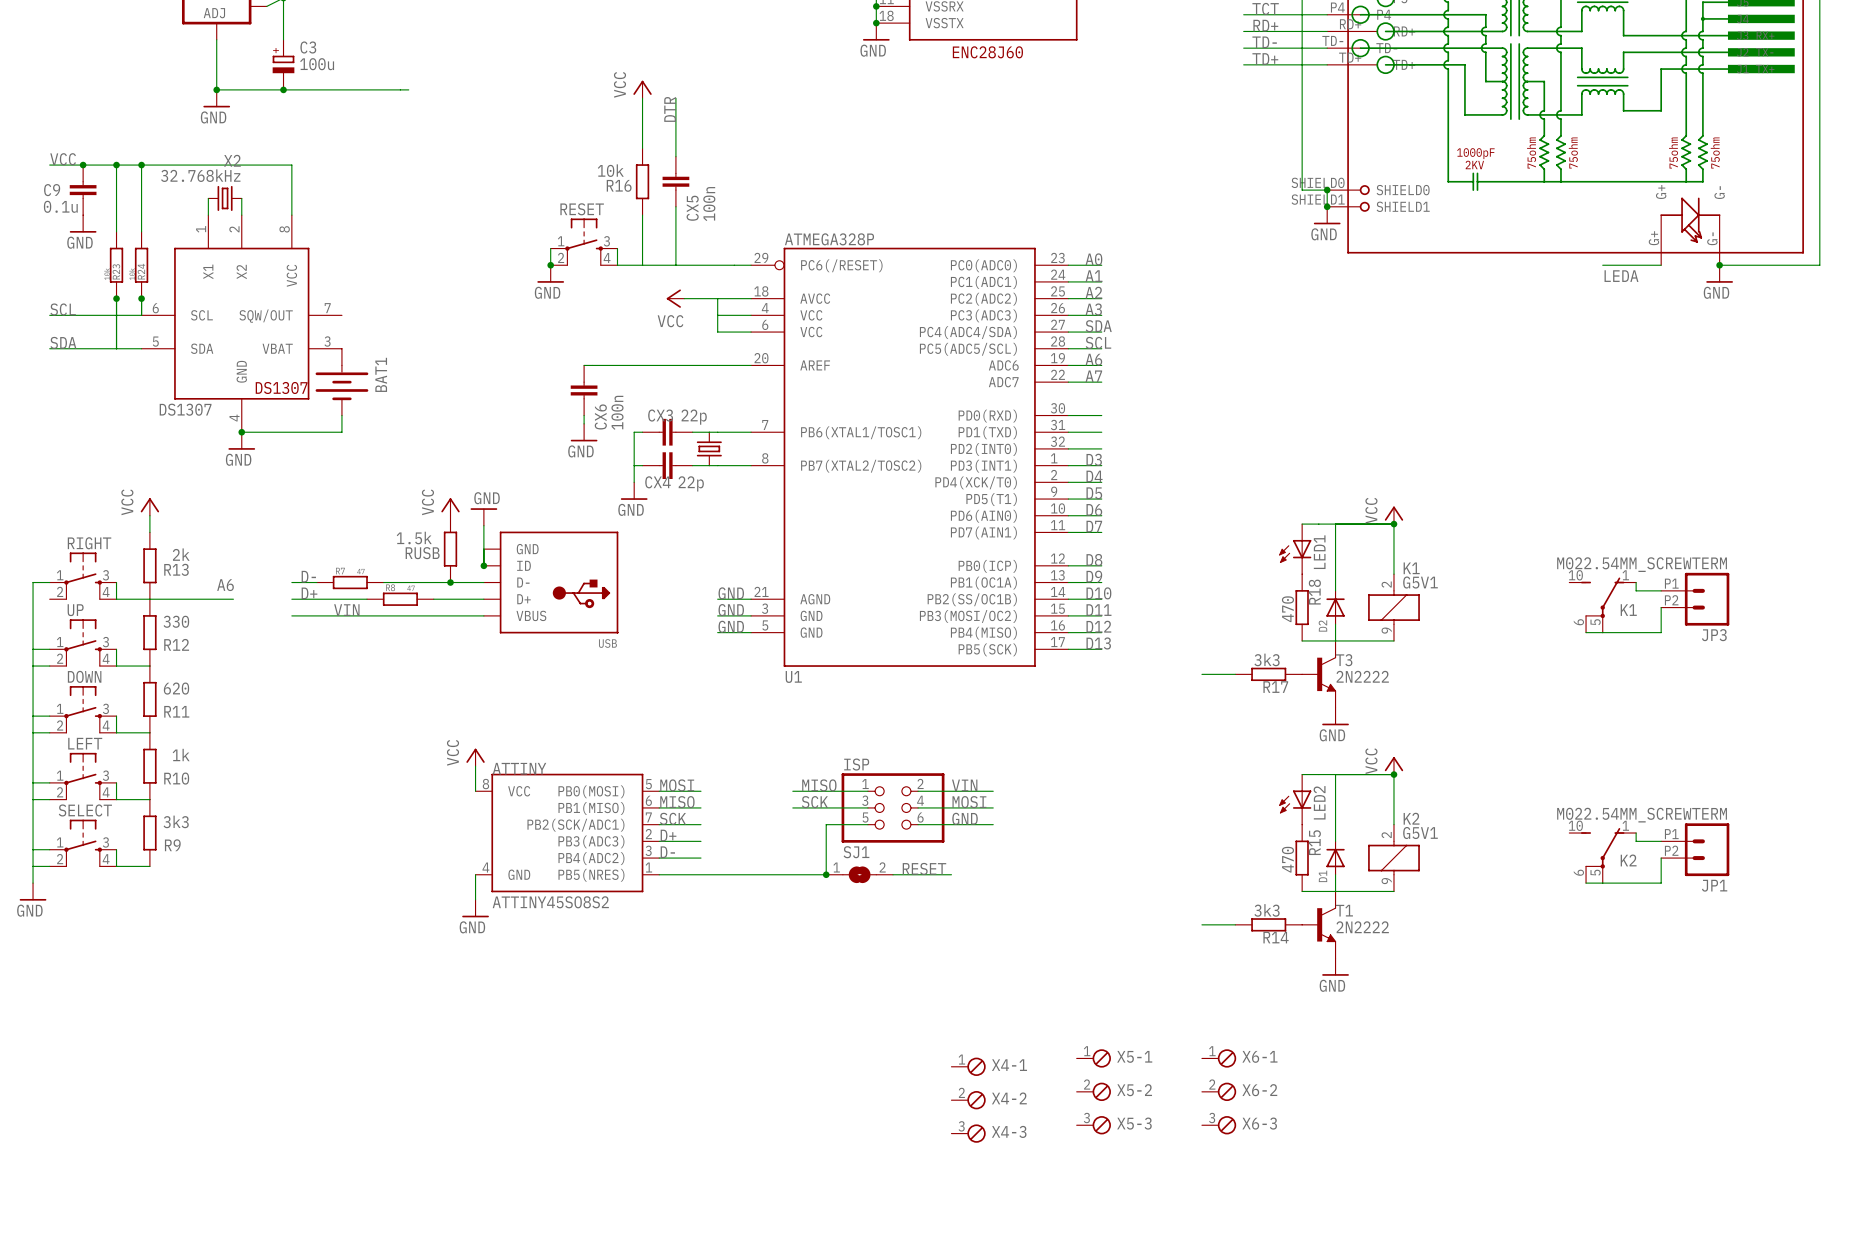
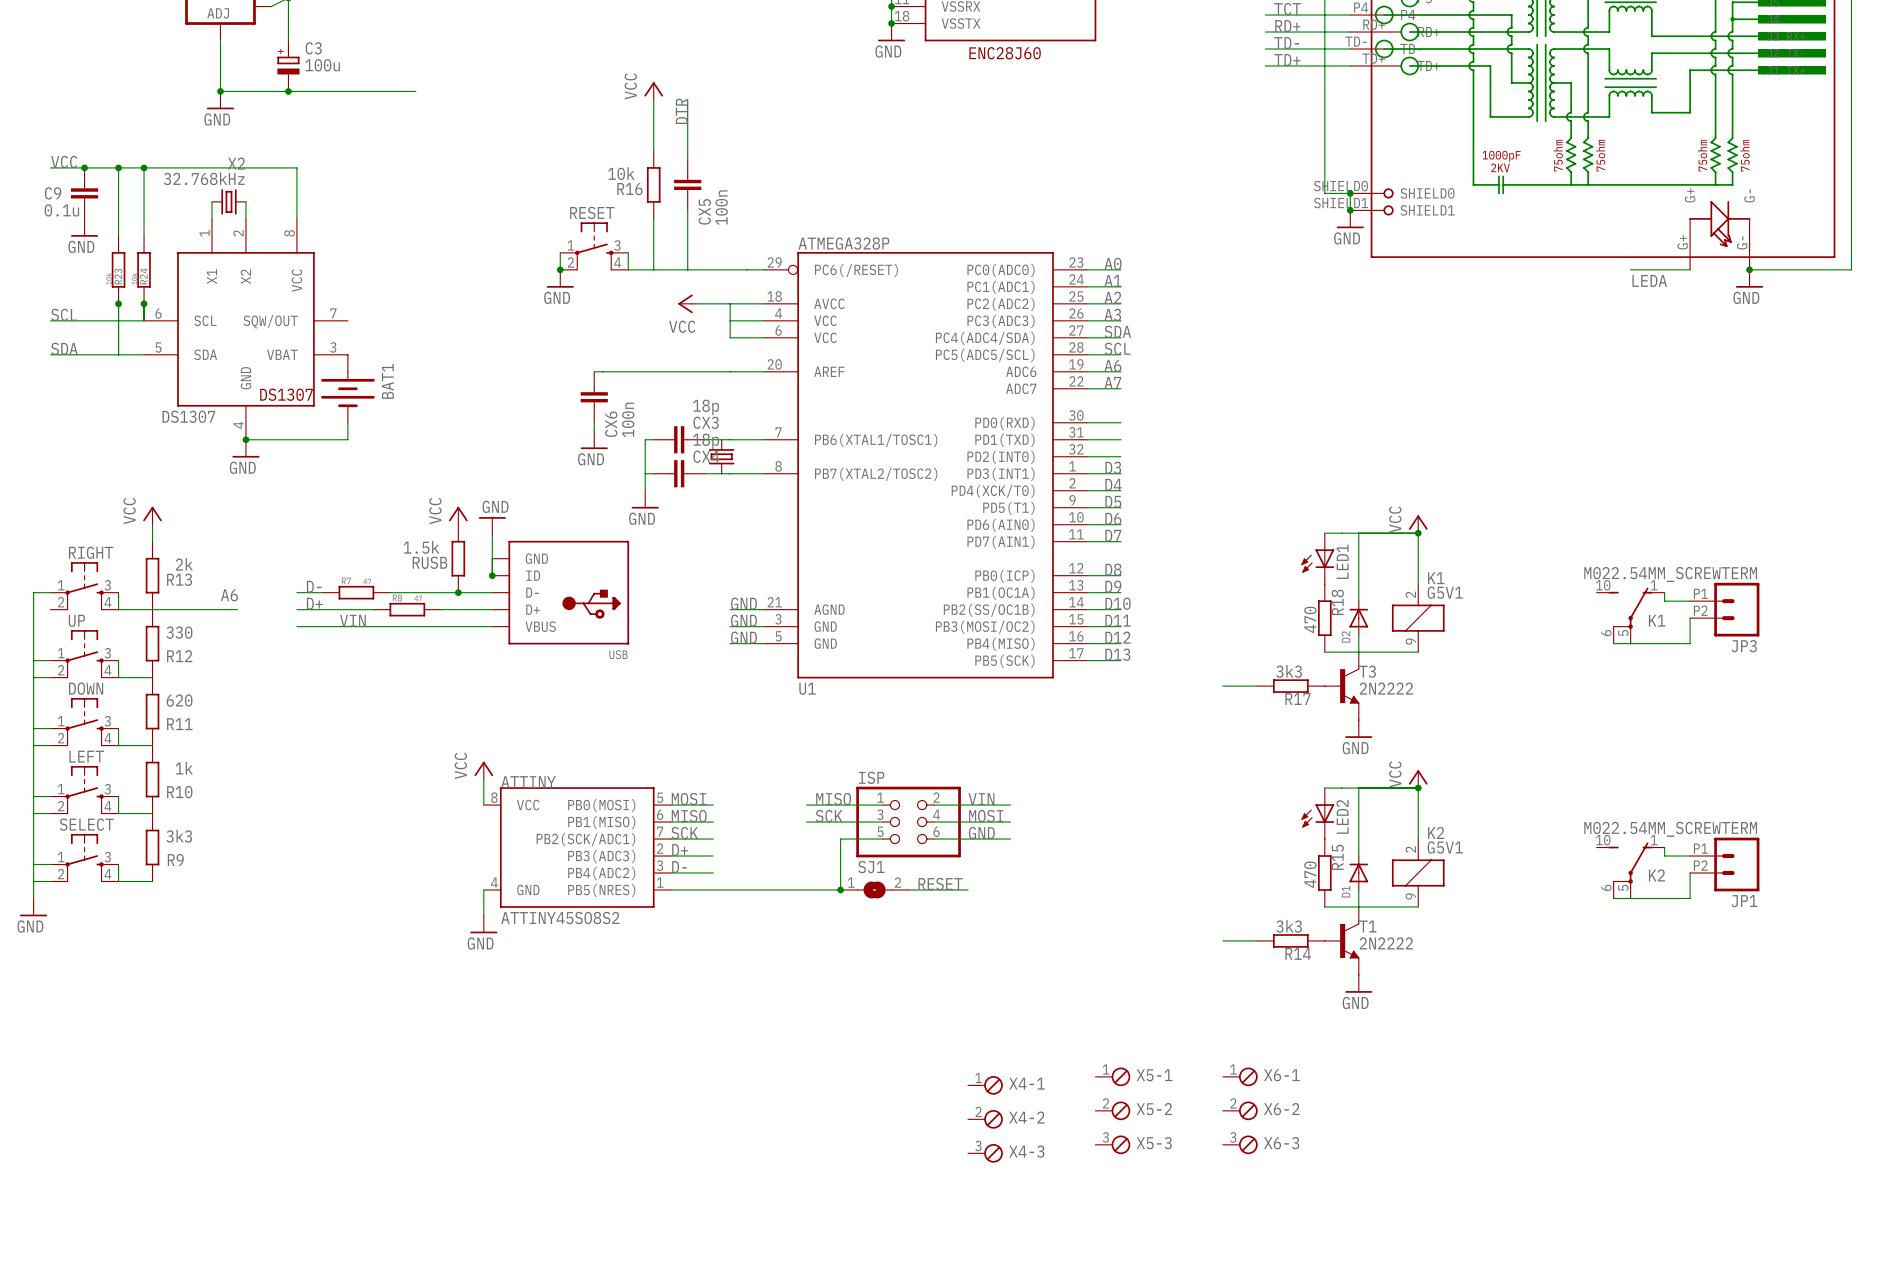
CX3 name position: CX3 (660, 415) -> CX3 (706, 422)
CX3 value: 22p (694, 417) -> 18p (706, 407)
CX4 name position: CX4 (658, 482) -> CX4 (706, 456)
CX4 value: 22p (691, 483) -> 18p (706, 441)

